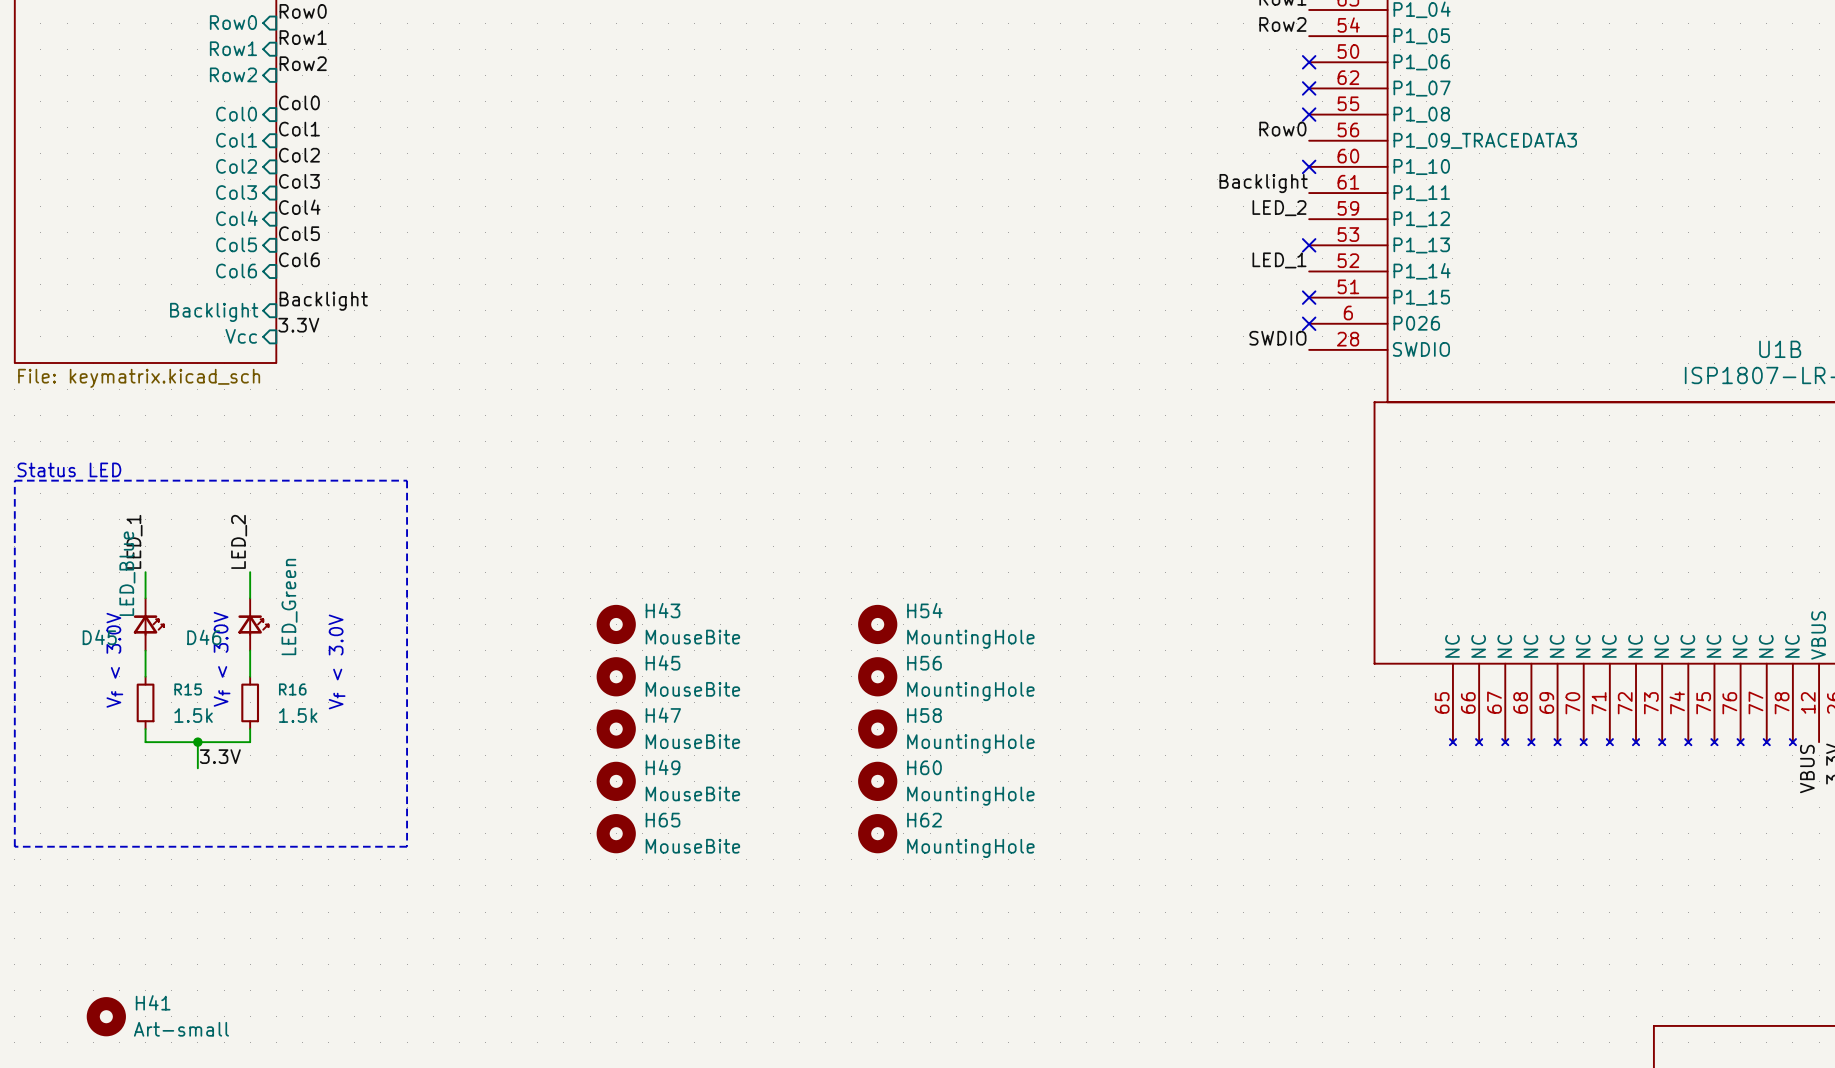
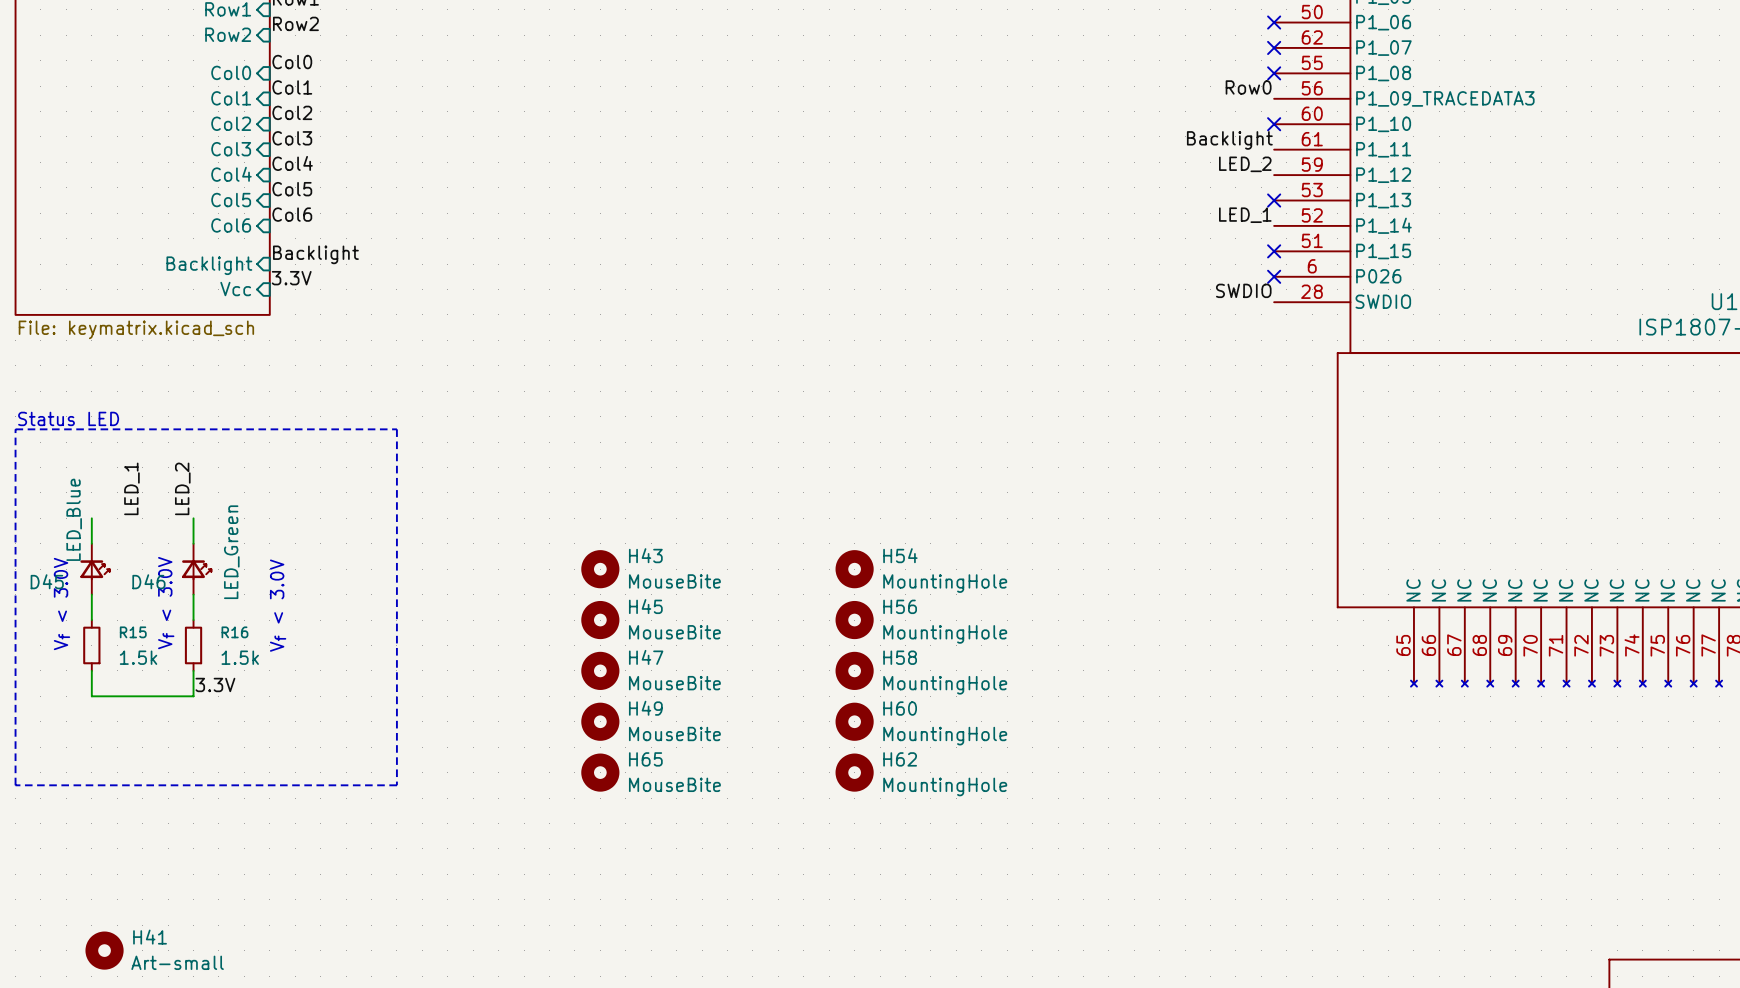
label position: LED_2 (239, 541) -> LED_2 (182, 488)
wire: (145, 572) (145, 598) -> (91, 518) (91, 543)
wire: (250, 572) (250, 598) -> (193, 518) (193, 543)
D45 position: (148, 624) -> (95, 569)
D46 position: (253, 624) -> (196, 569)
wire: (145, 650) (145, 676) -> (91, 594) (91, 620)
wire: (250, 650) (250, 676) -> (193, 594) (193, 620)
text: none -> Vf < 3.0V (166, 603)
text: Vf < 3.0V (222, 659) -> none
text position: Vf < 3.0V (114, 660) -> Vf < 3.0V (61, 604)
text: none -> Vf < 3.0V (278, 605)
text: Vf < 3.0V (337, 661) -> none
R15 position: (145, 702) -> (91, 645)
R16 position: (250, 702) -> (193, 645)
wire: (145, 729) (145, 742) (250, 742) (250, 729) -> none
wire: none -> (193, 670) (193, 683)
junction: (197, 742) -> none
wire: (197, 755) (197, 768) -> (193, 696) (91, 696) (91, 670)
label position: 3.3V (220, 756) -> 3.3V (215, 684)

